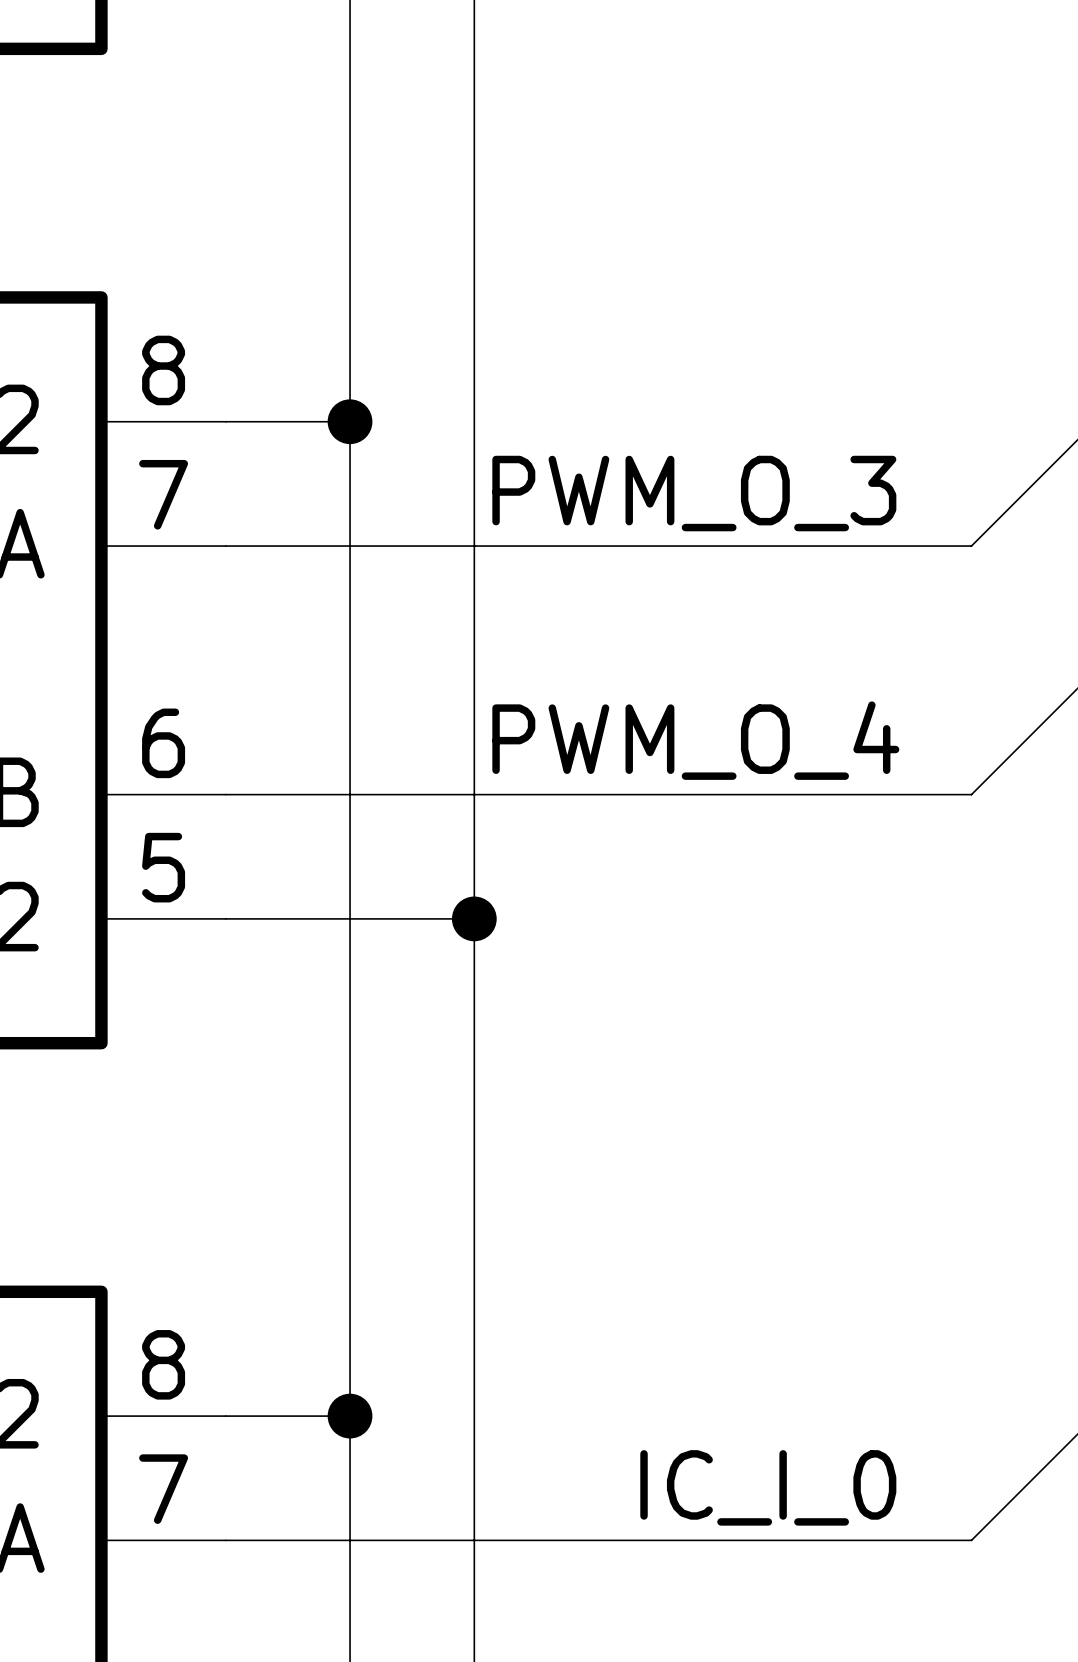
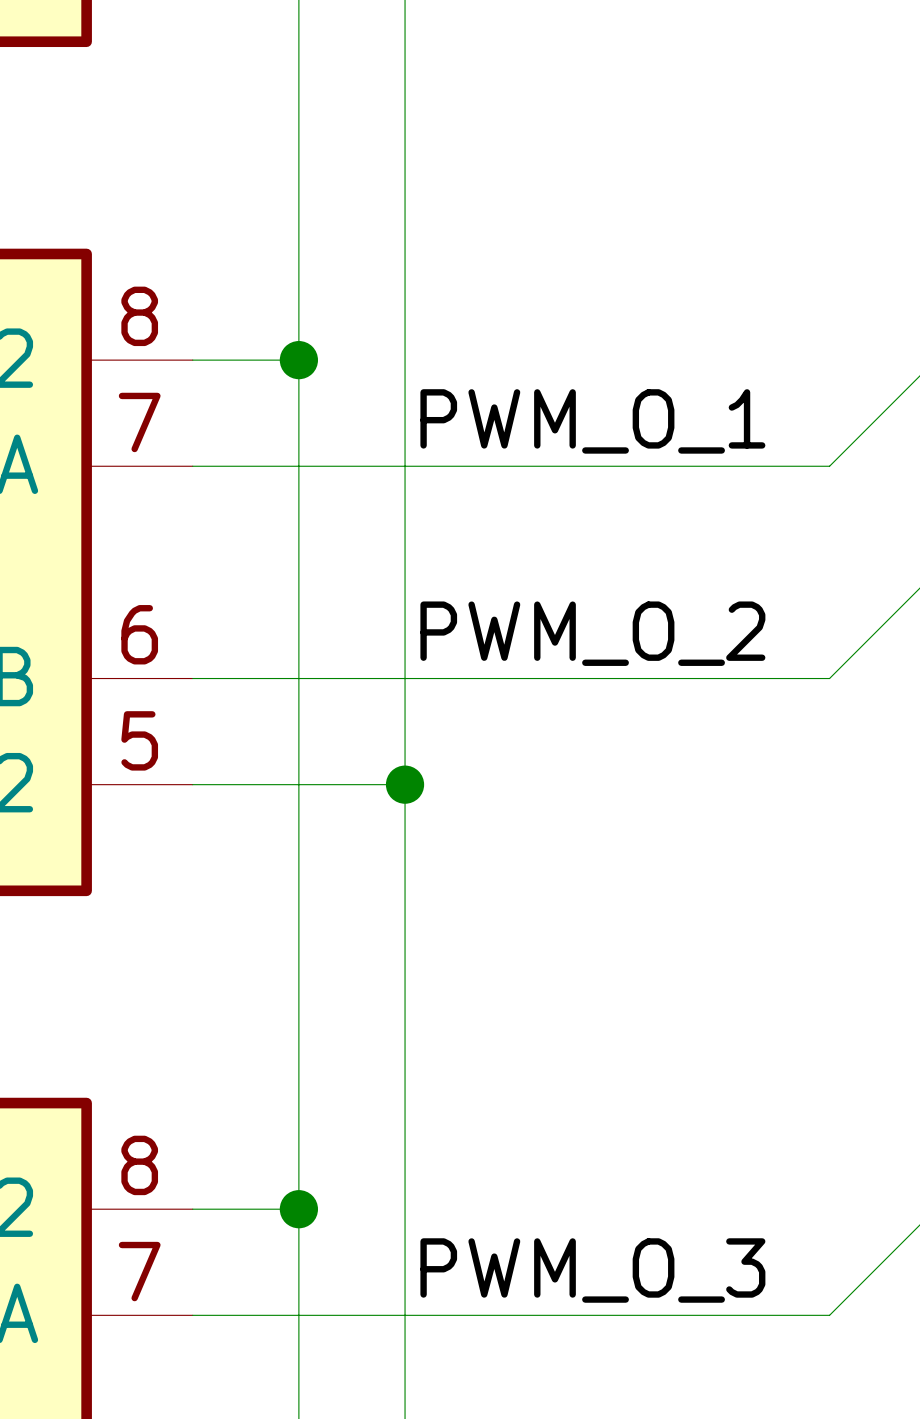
label: PWM_O_3 (694, 493) -> PWM_O_1 (592, 421)
label: PWM_O_4 (695, 740) -> PWM_O_2 (592, 633)
label: IC_I_0 (768, 1487) -> PWM_O_3 (592, 1270)

